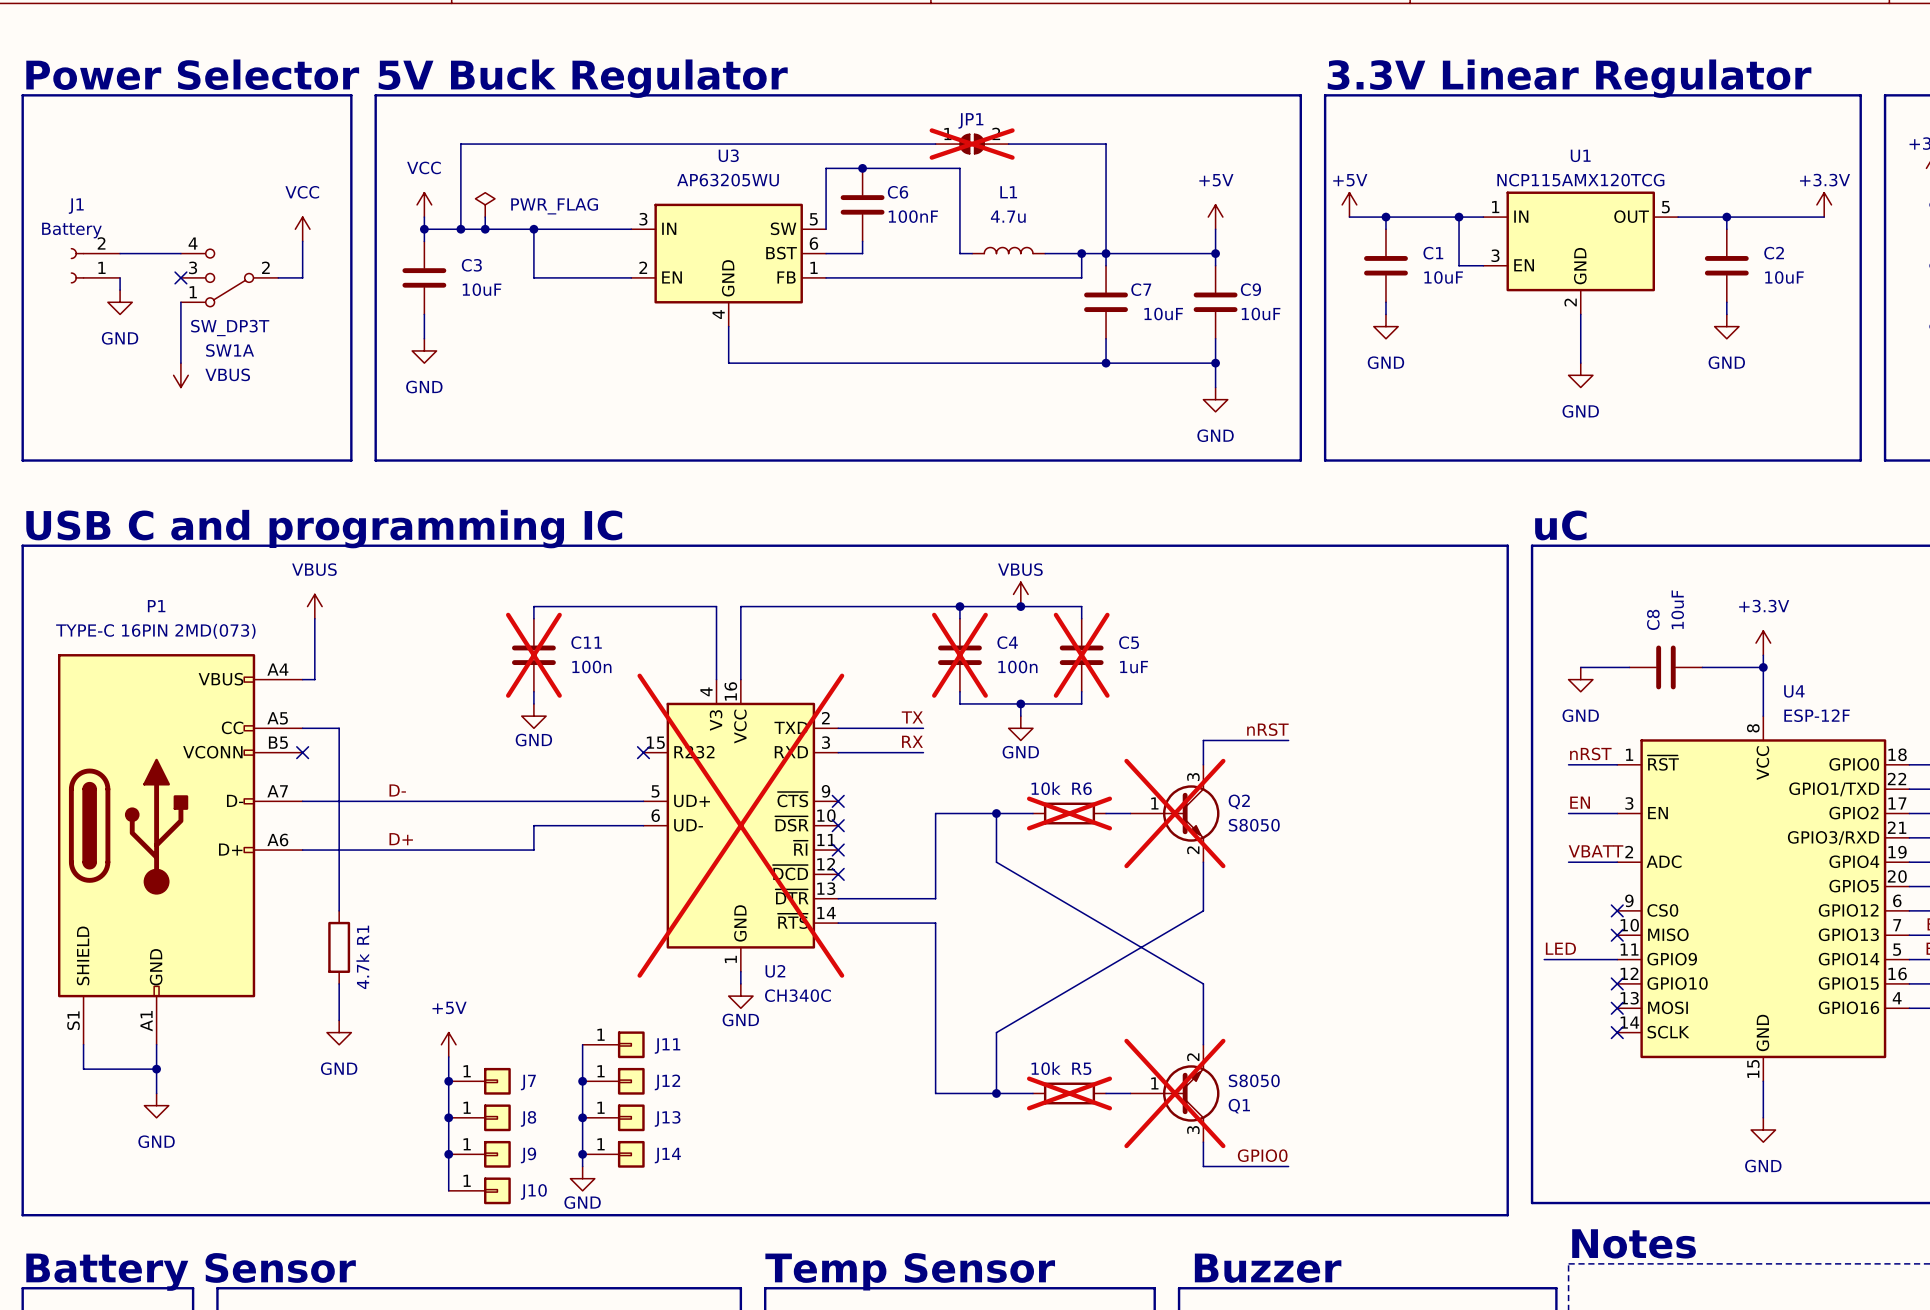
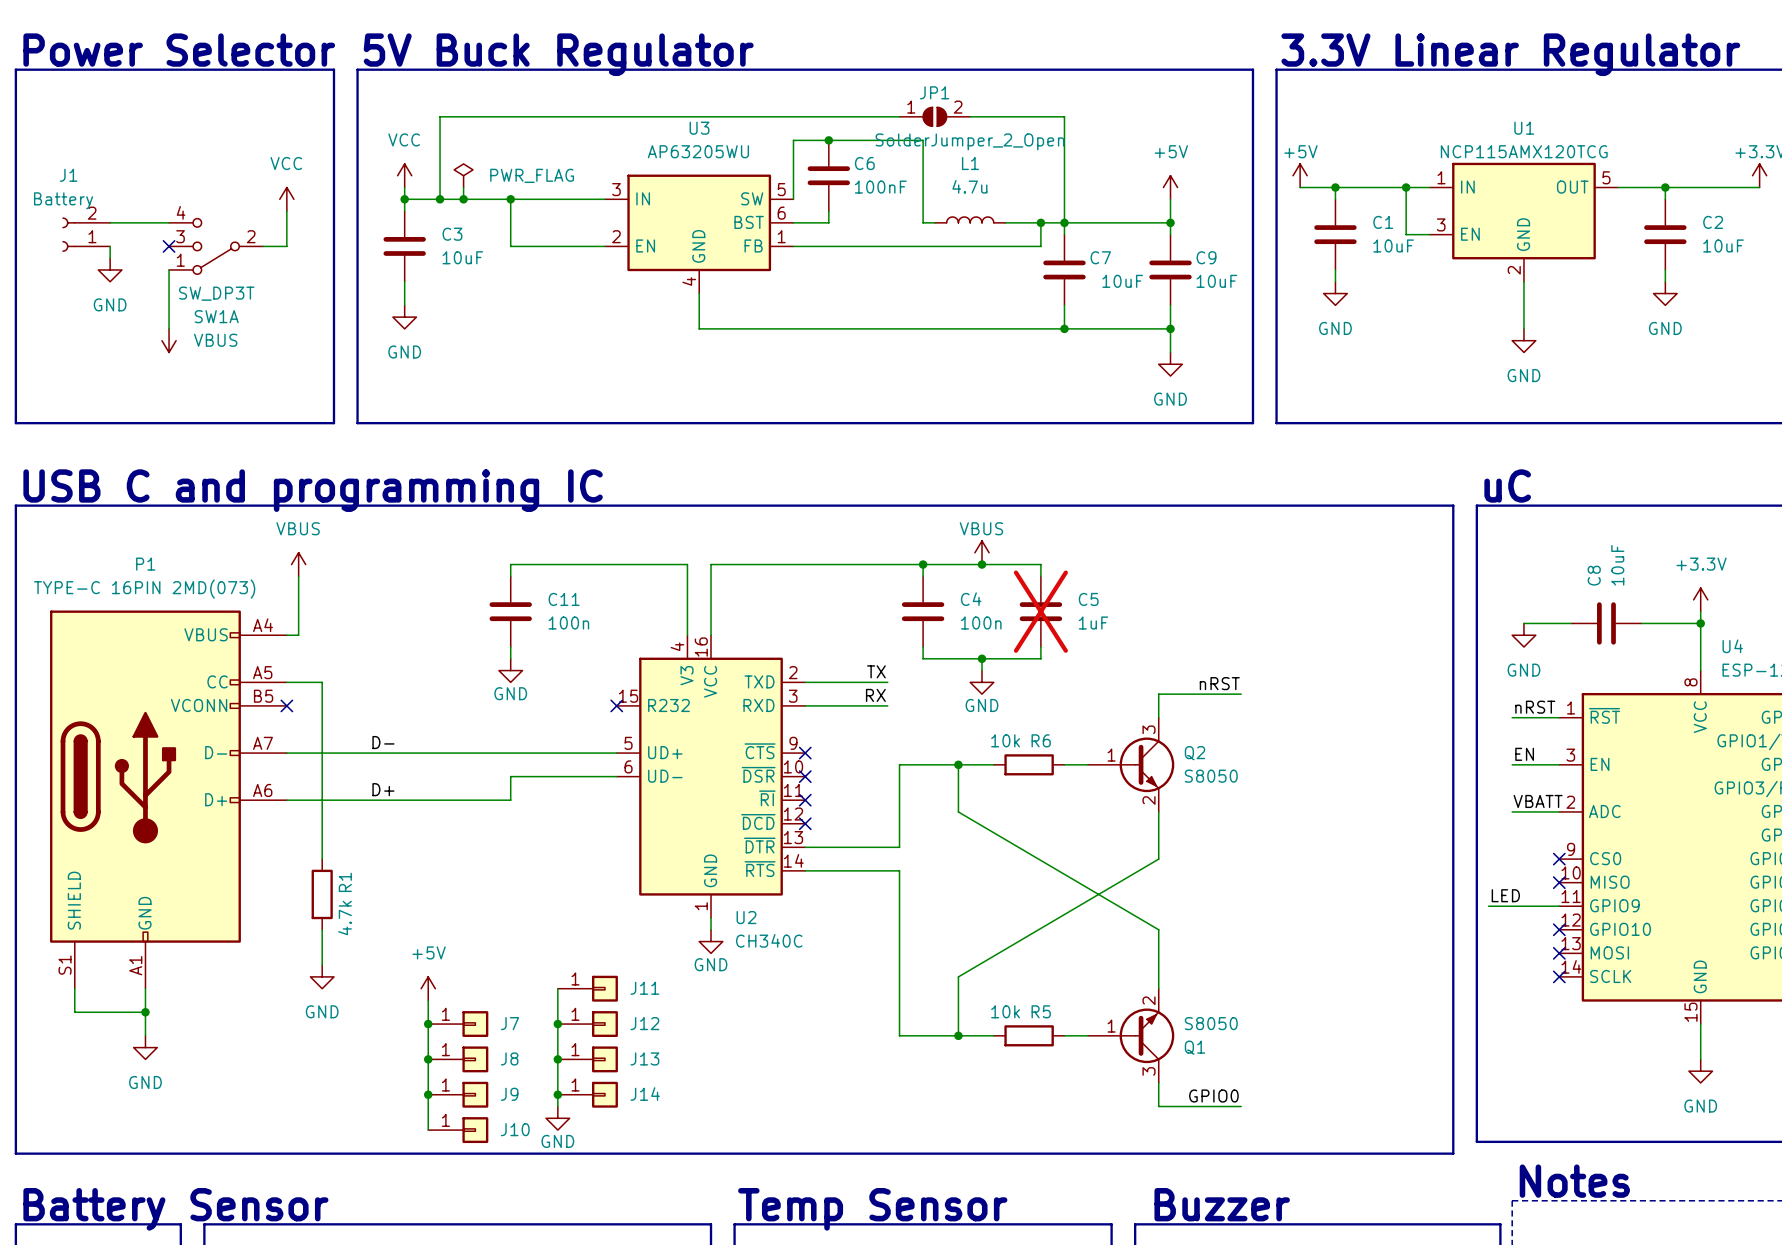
JP1 do-not-place cross: (972, 144) -> none
JP1 value: none -> SolderJumper_2_Open (969, 141)
C11 do-not-place cross: (533, 655) -> none
C4 do-not-place cross: (959, 655) -> none
R6 do-not-place cross: (1069, 813) -> none
Q2 do-not-place cross: (1174, 813) -> none
U2 do-not-place cross: (740, 825) -> none
R5 do-not-place cross: (1069, 1093) -> none
Q1 do-not-place cross: (1174, 1093) -> none

